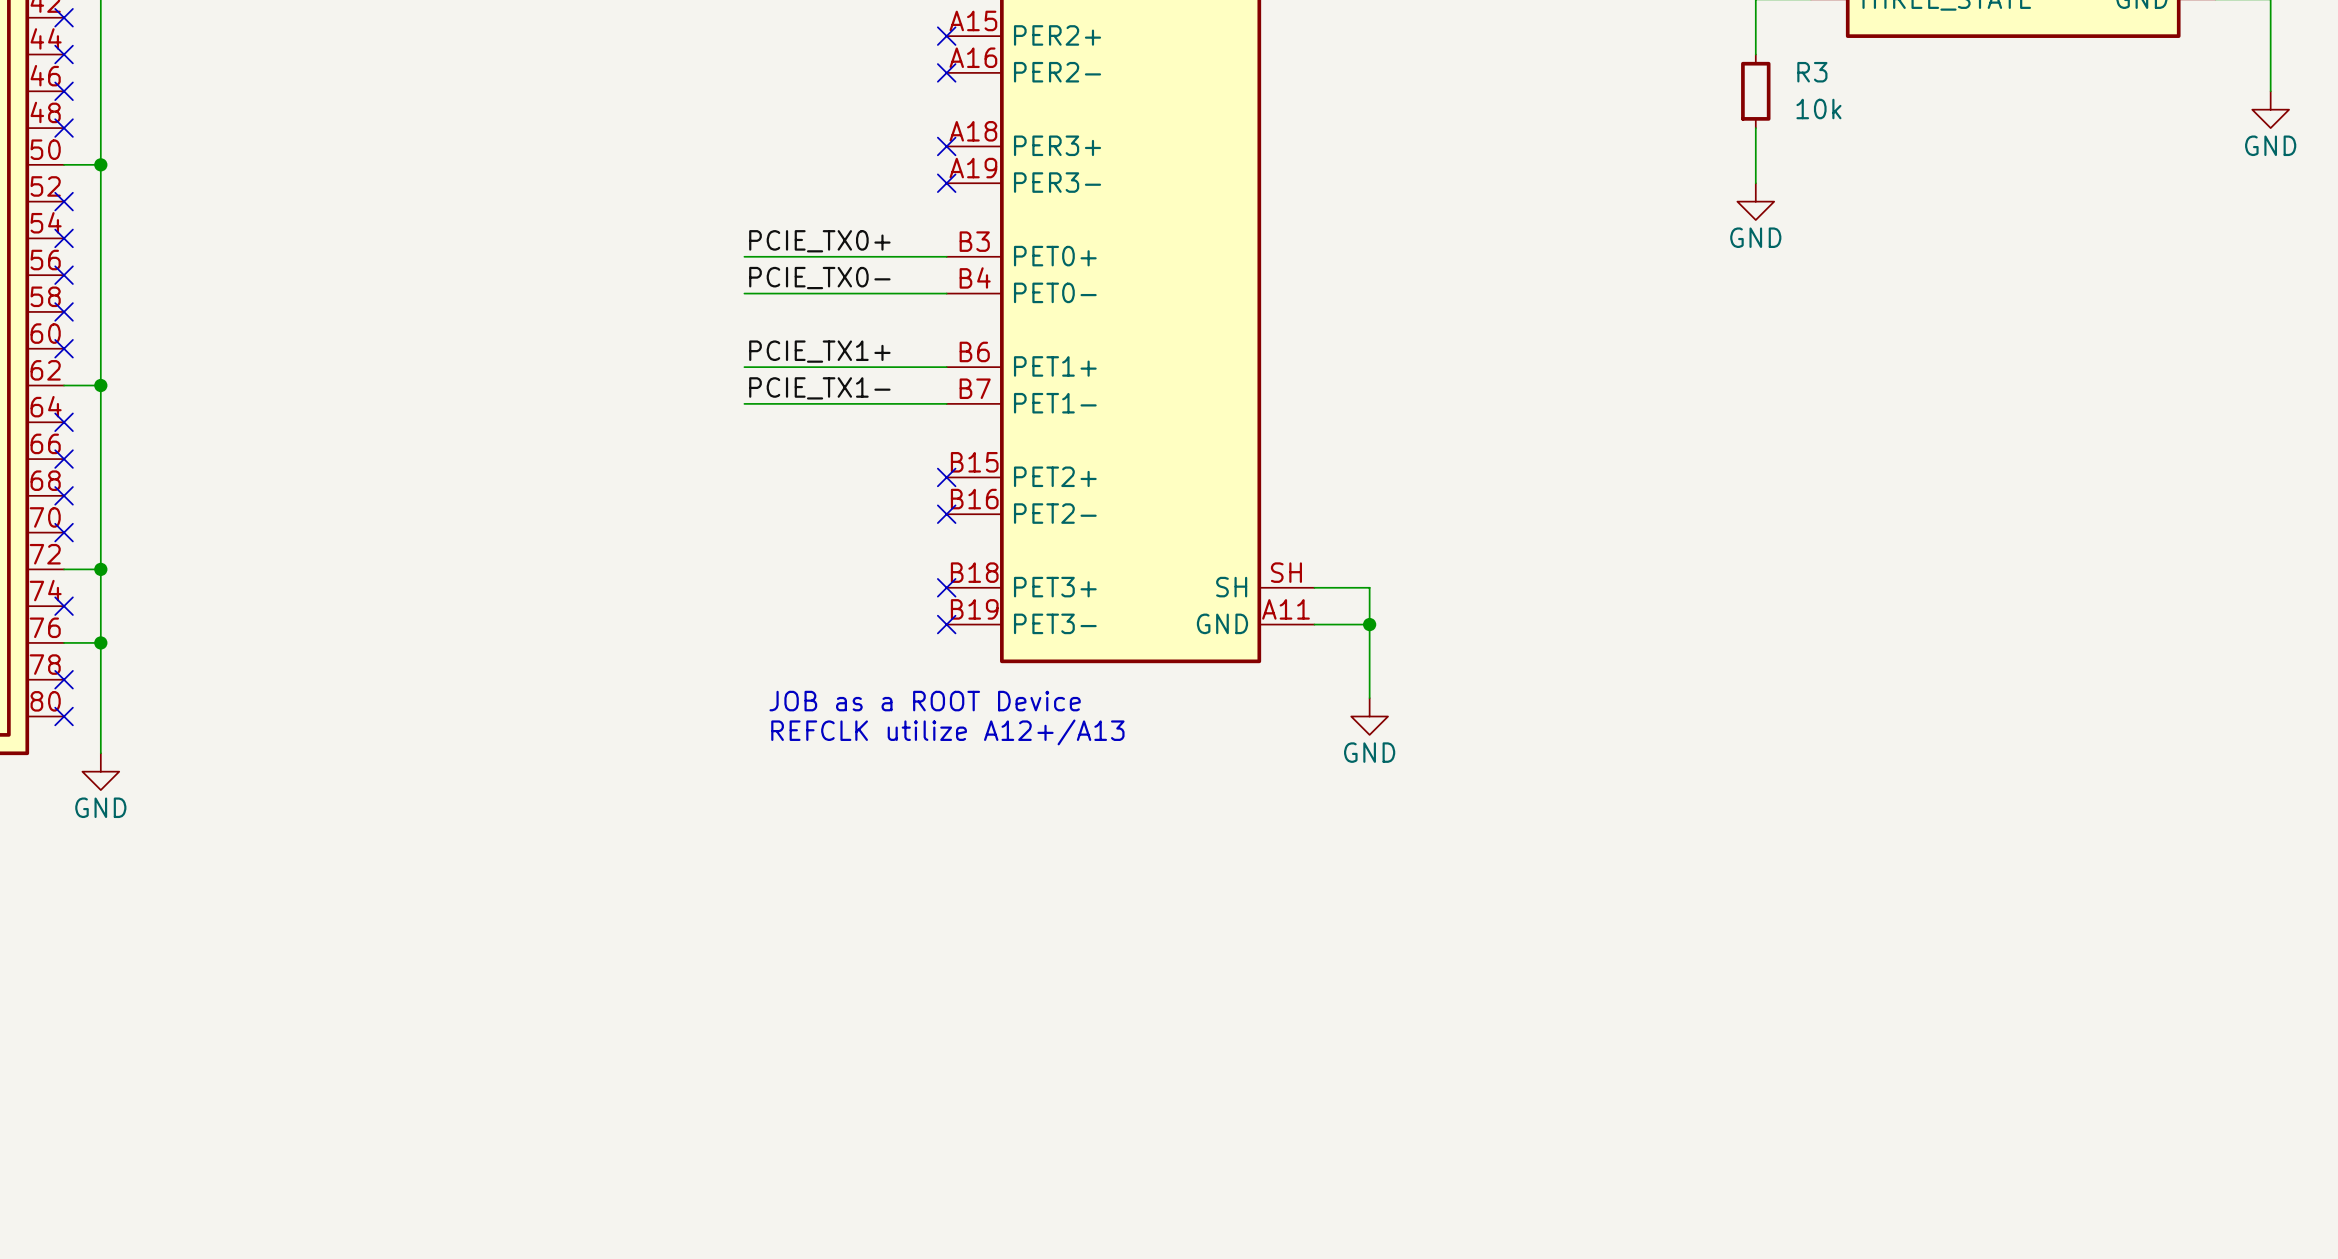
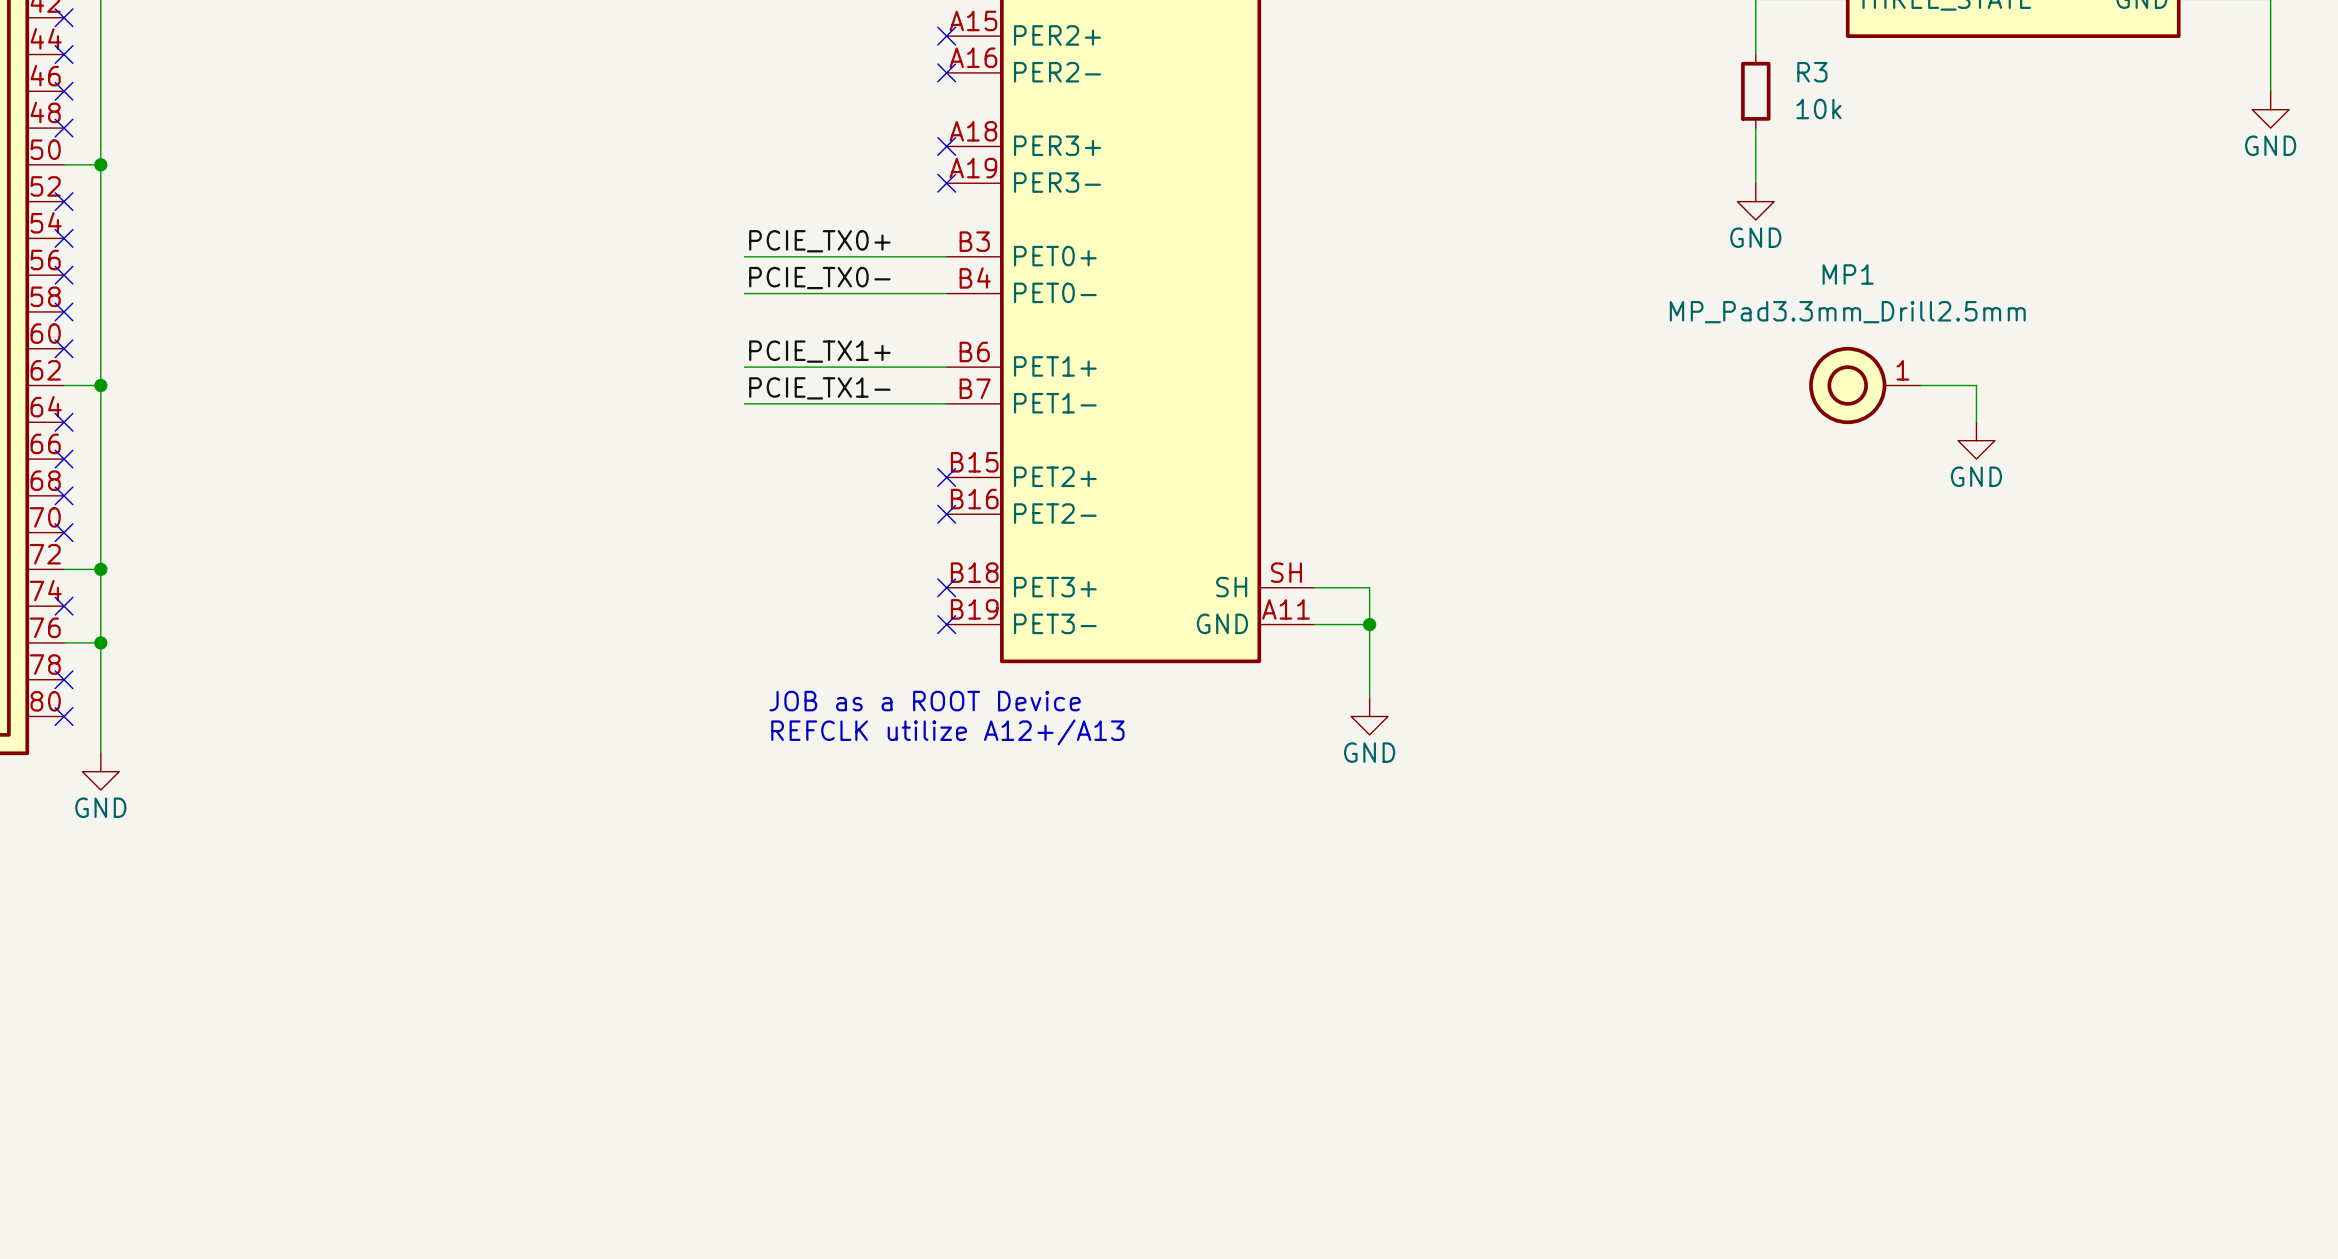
MP1: none -> MP_Pad3.3mm_Drill2.5mm (1865, 385)
wire: none -> (1921, 385) (1976, 385) (1976, 422)
power symbol: none -> GND (1976, 440)

